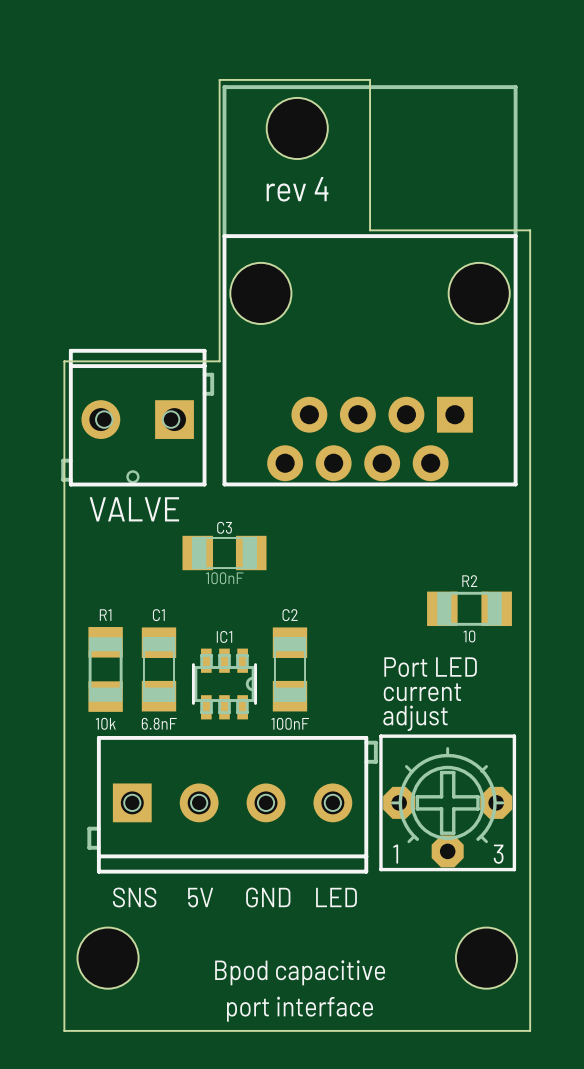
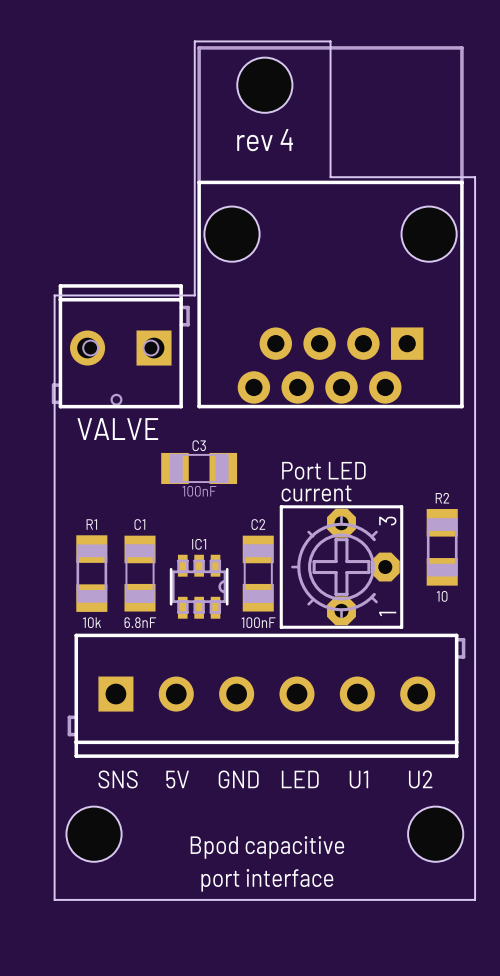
R2 rotation: 0° (469, 608) -> 90° clockwise (442, 547)
text position: Port LED (430, 667) -> Port LED (323, 470)
text position: current (422, 692) -> current (316, 493)
text: adjust (415, 718) -> none
part rotation: 0° (447, 802) -> 90° counterclockwise (341, 567)
part position: (447, 802) -> (341, 567)
part: (232, 804) -> none
part: none -> (266, 695)
text: none -> U1 (358, 779)
text: none -> U2 (420, 779)

